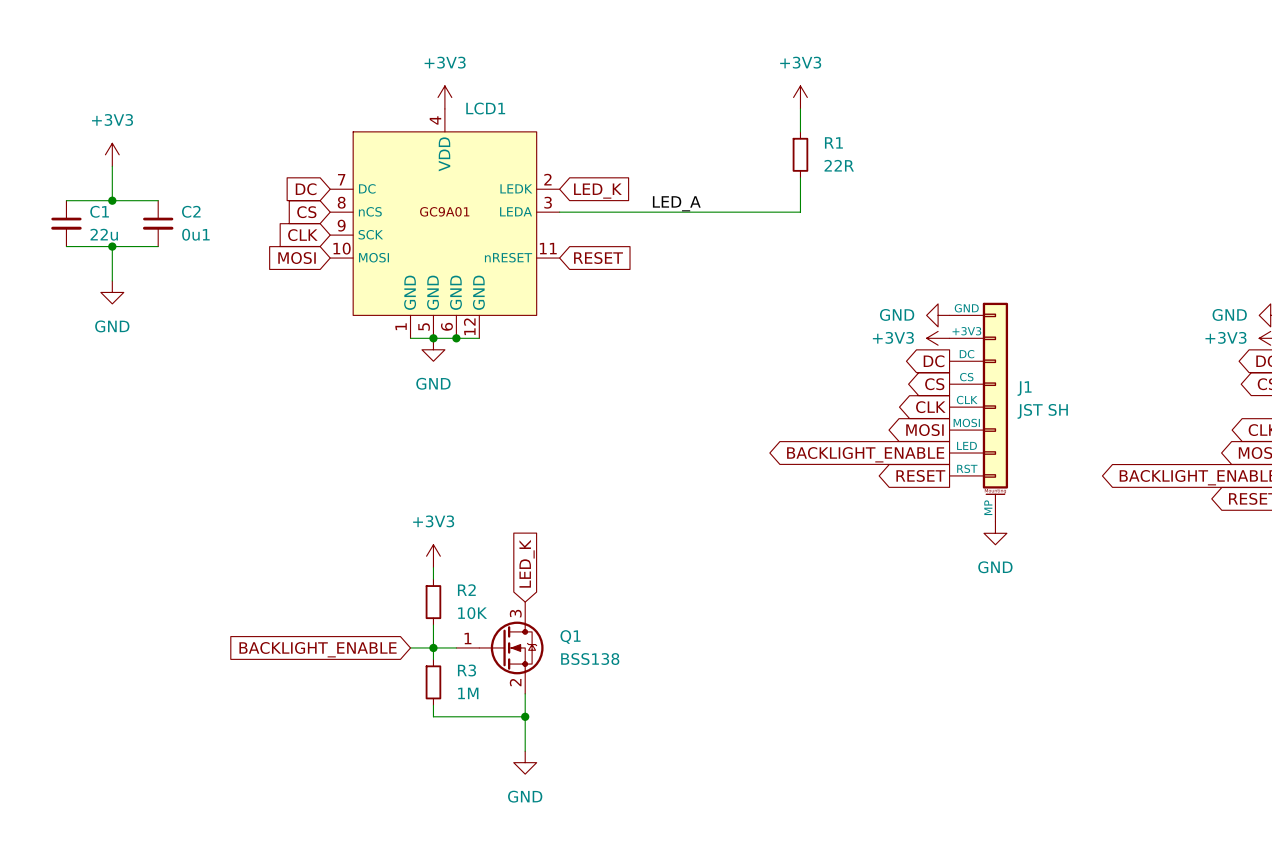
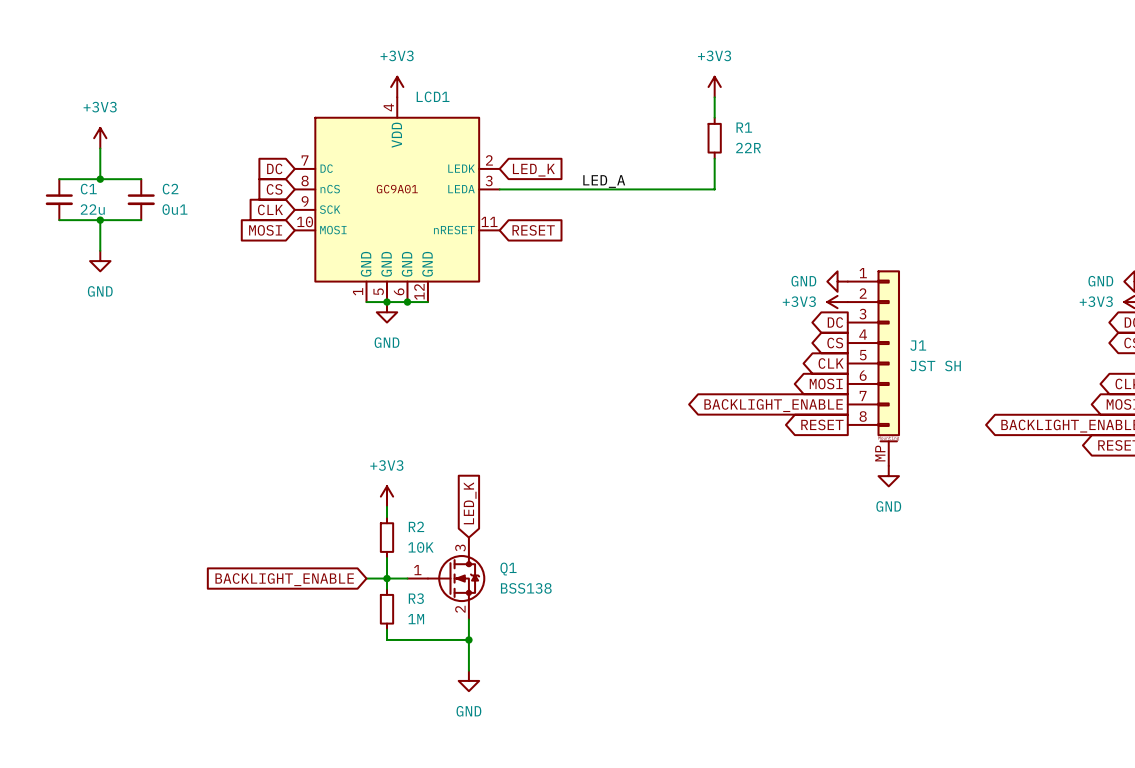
J1 symbol: [949, 302, 1009, 522] -> [847, 270, 901, 466]

